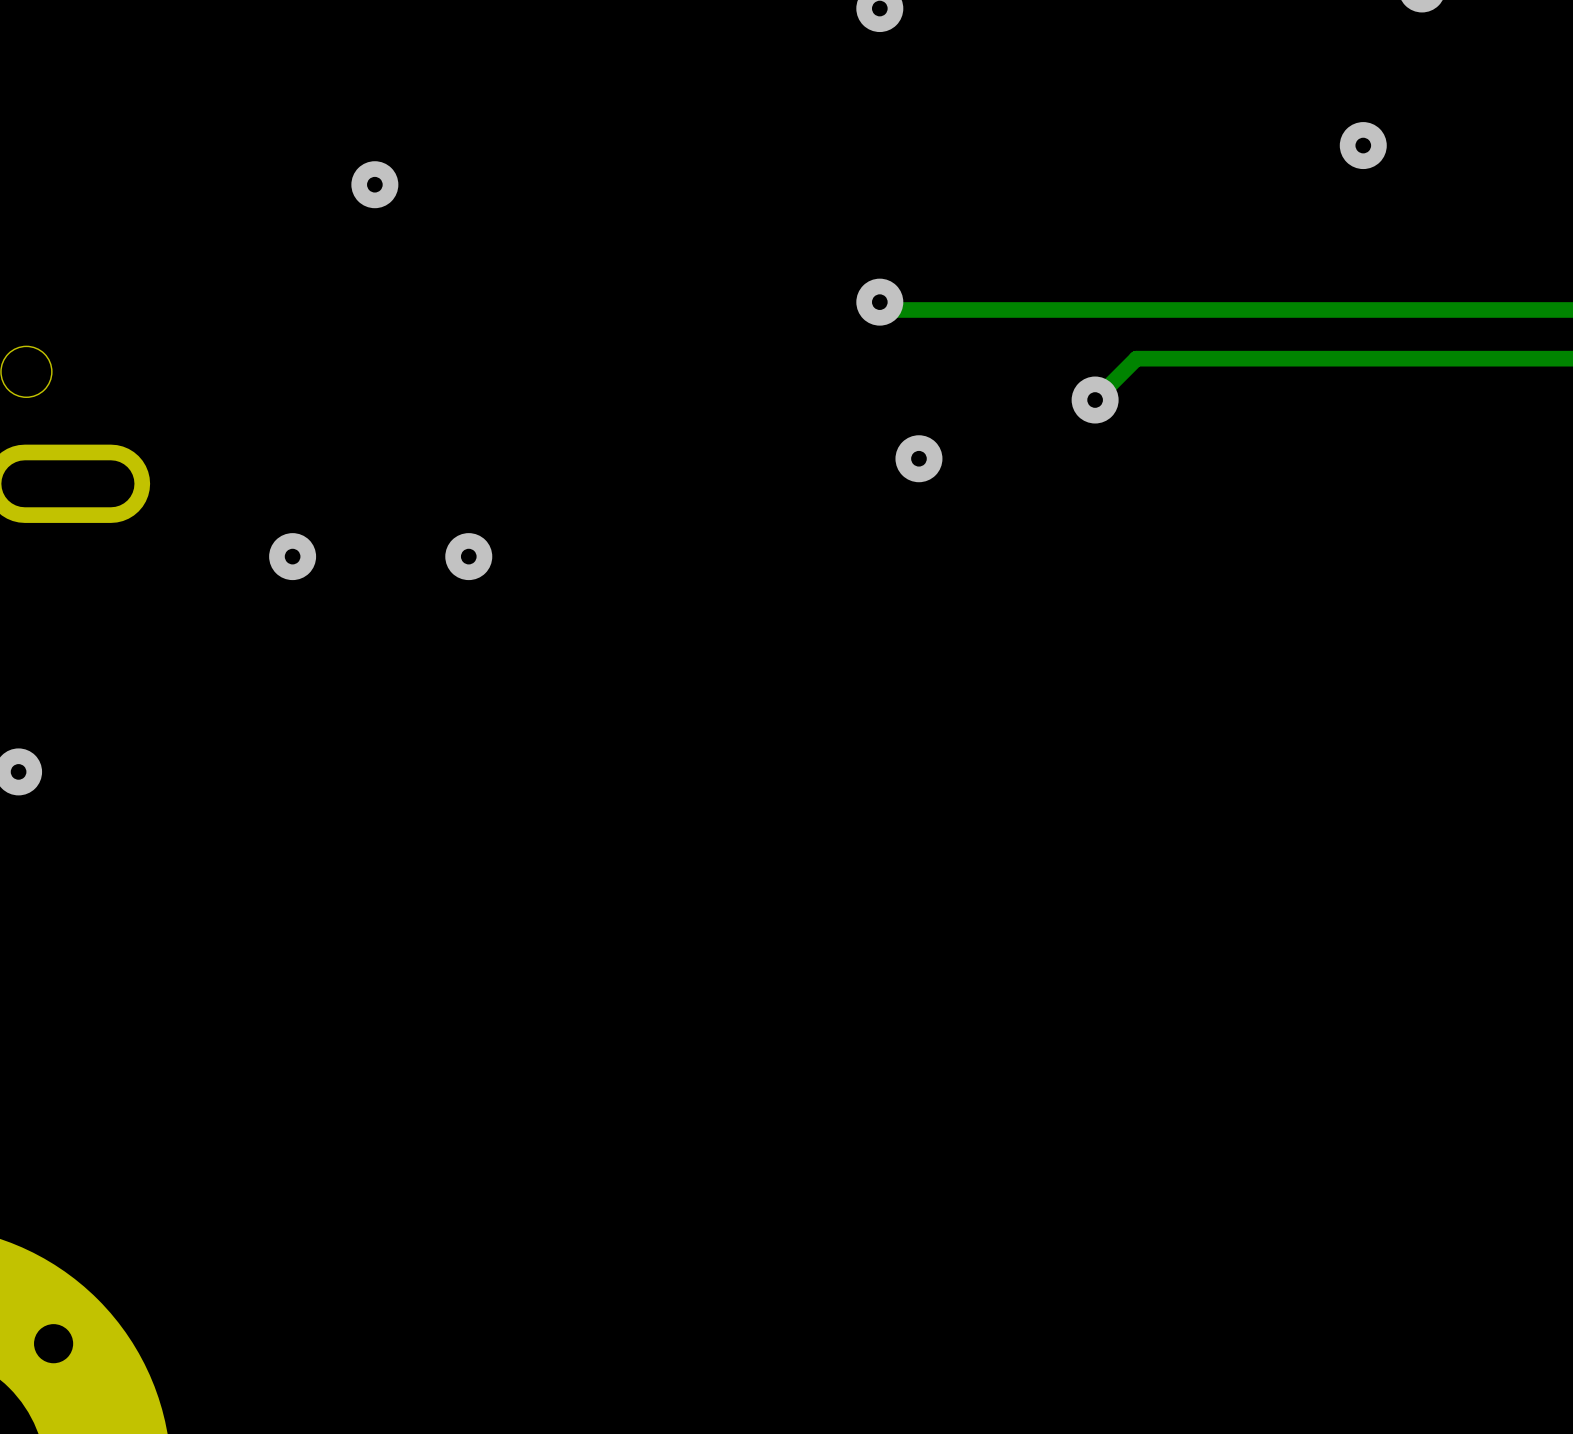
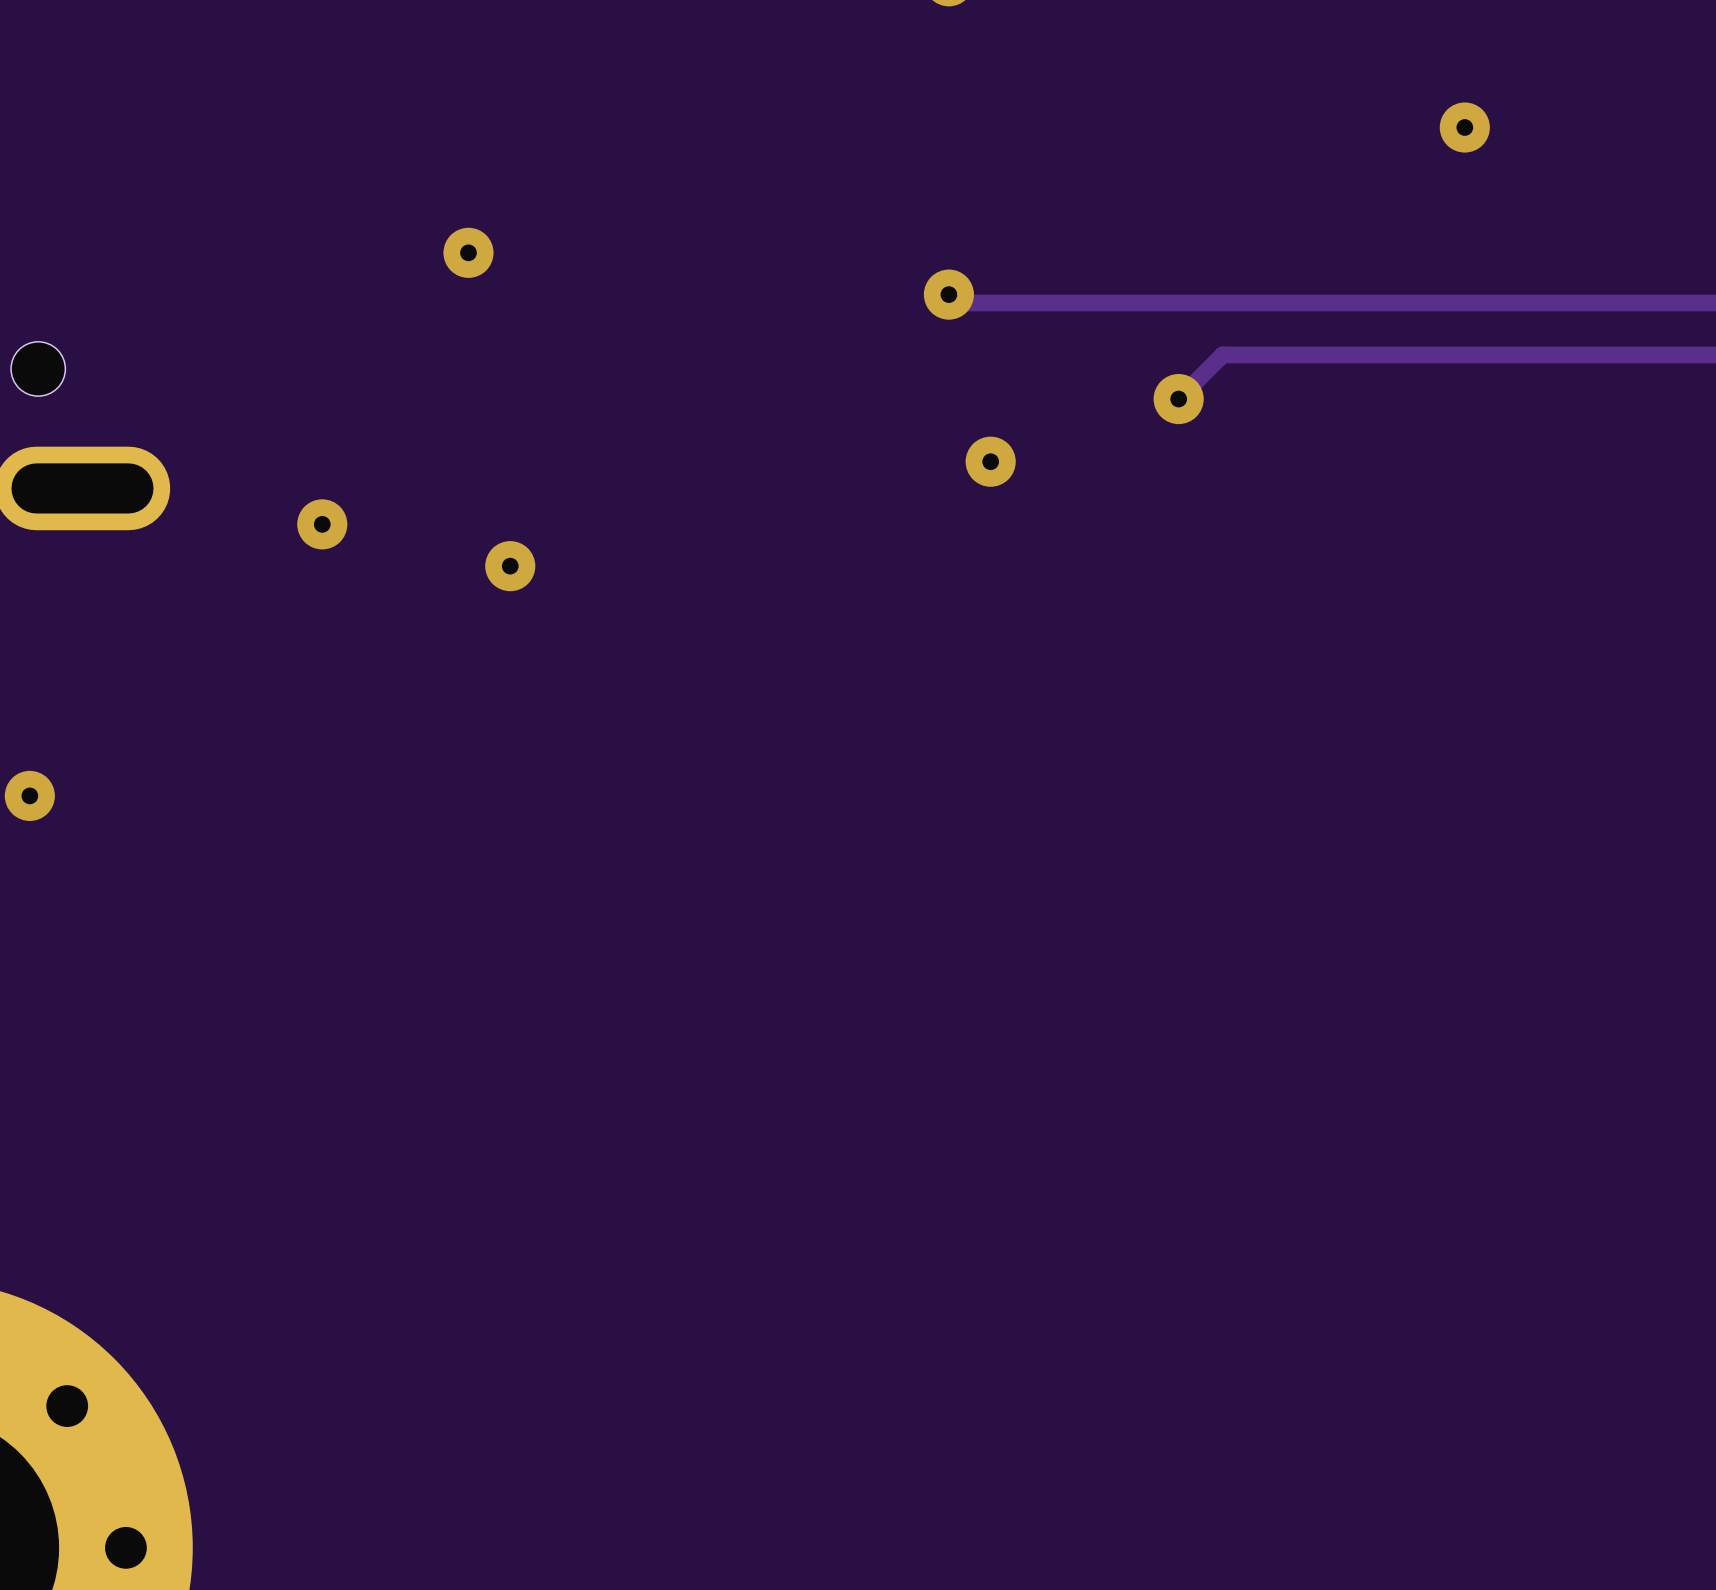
via position: (374, 184) -> (468, 252)
via position: (292, 556) -> (322, 524)

